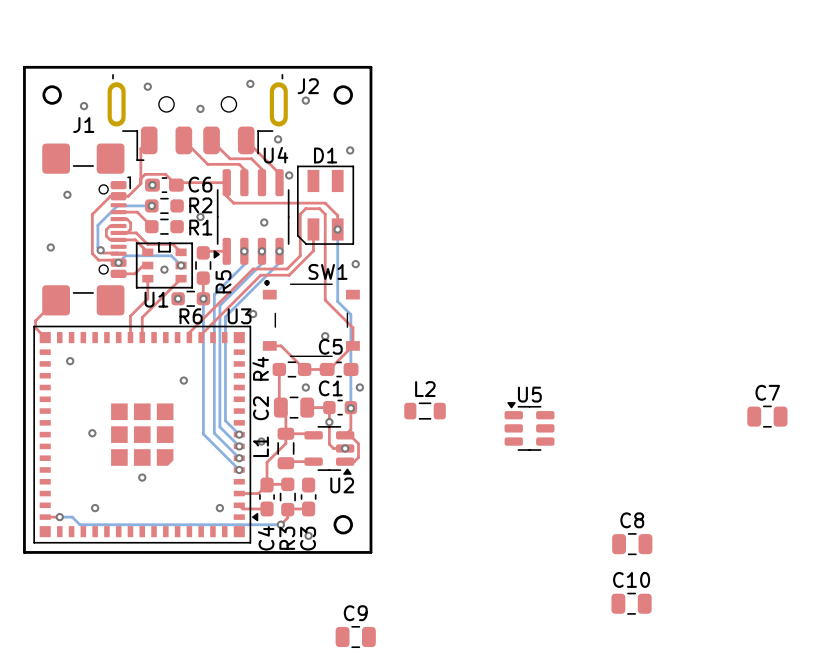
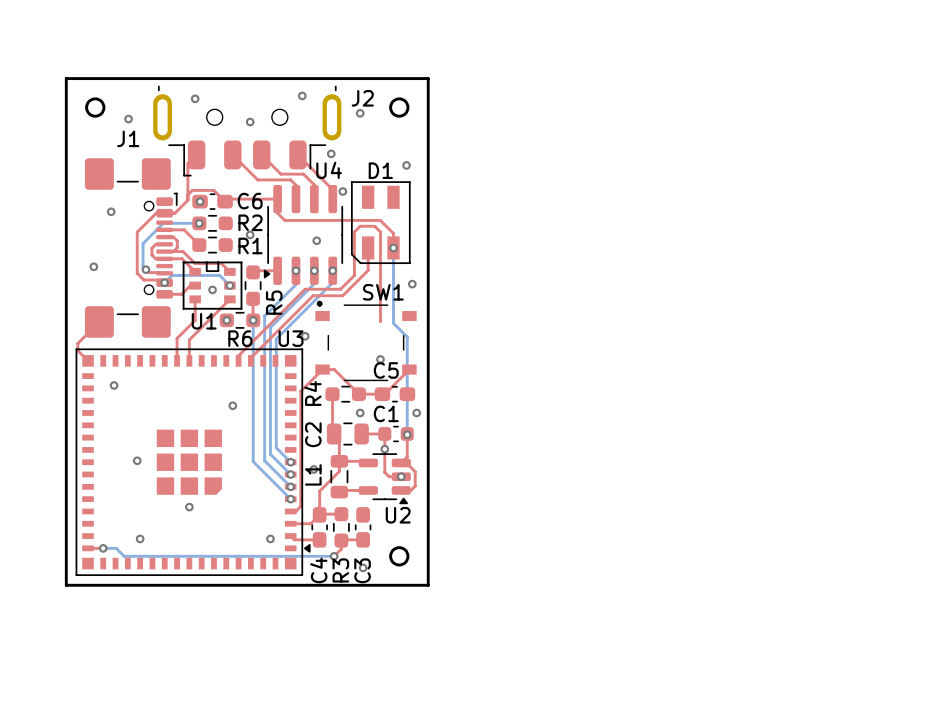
top track: (325, 300) (352, 327) (352, 345) -> none
top track: none -> (322, 369) (300, 391) (300, 506) (295, 511) (290, 511)
L2: (425, 411) -> none
C7: (767, 416) -> none
U5: (529, 426) -> none
C8: (632, 544) -> none
C10: (631, 603) -> none
C9: (355, 637) -> none

